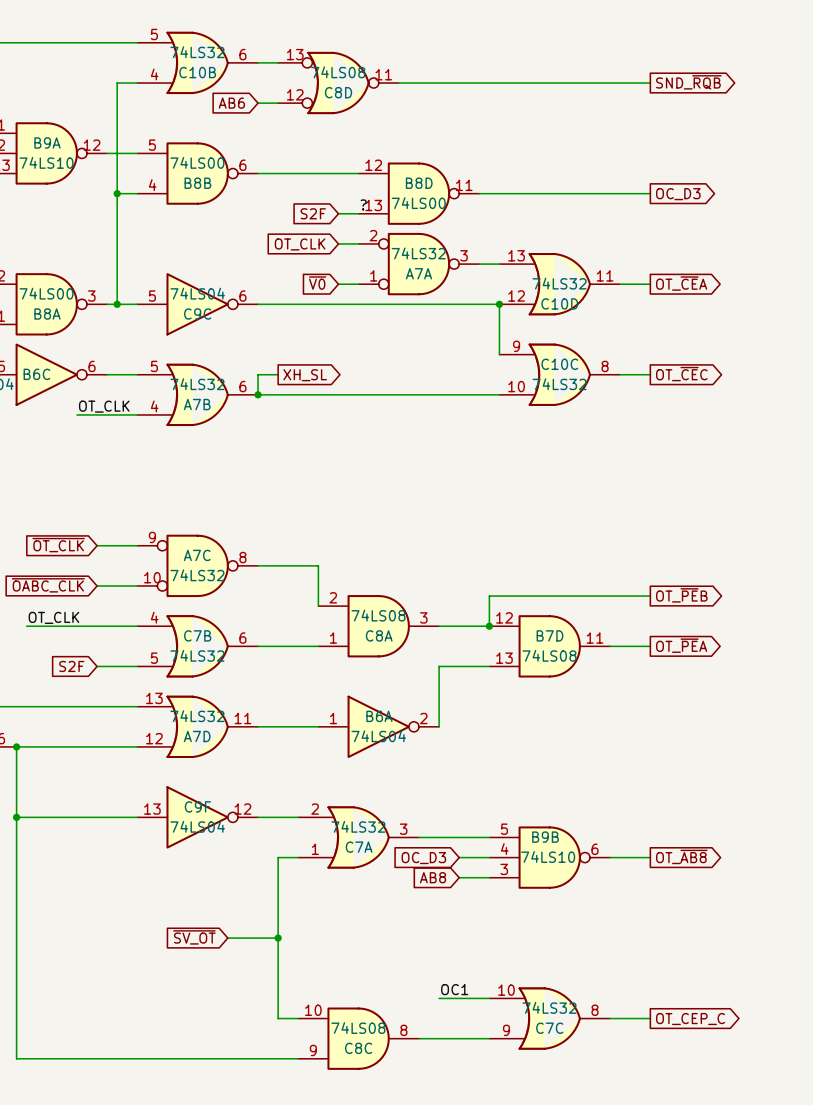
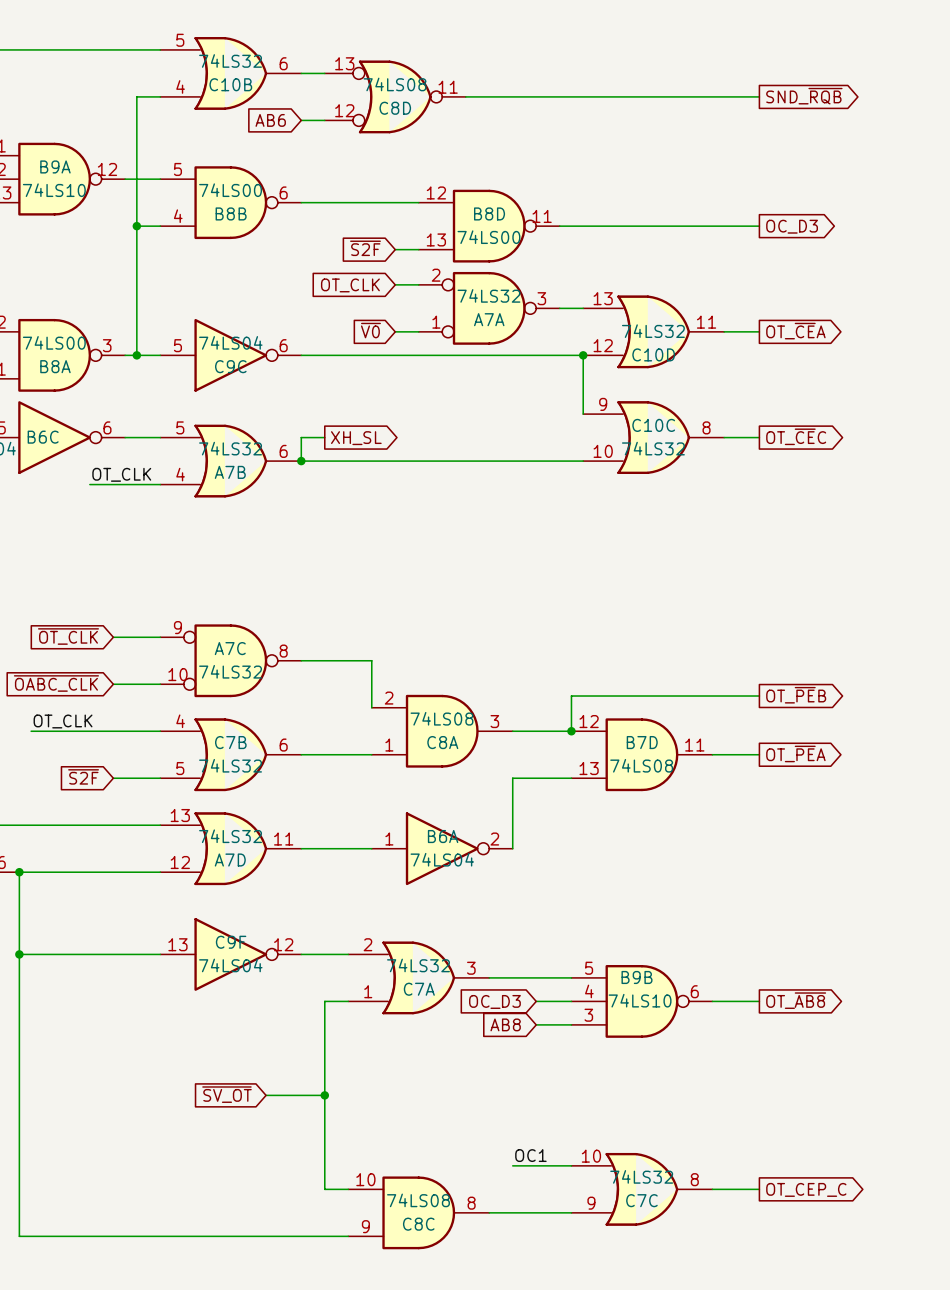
label: ? (363, 204) -> none
global label: S2F (313, 213) -> ~{S2F} (365, 248)
global label: S2F (71, 666) -> ~{S2F} (83, 776)

